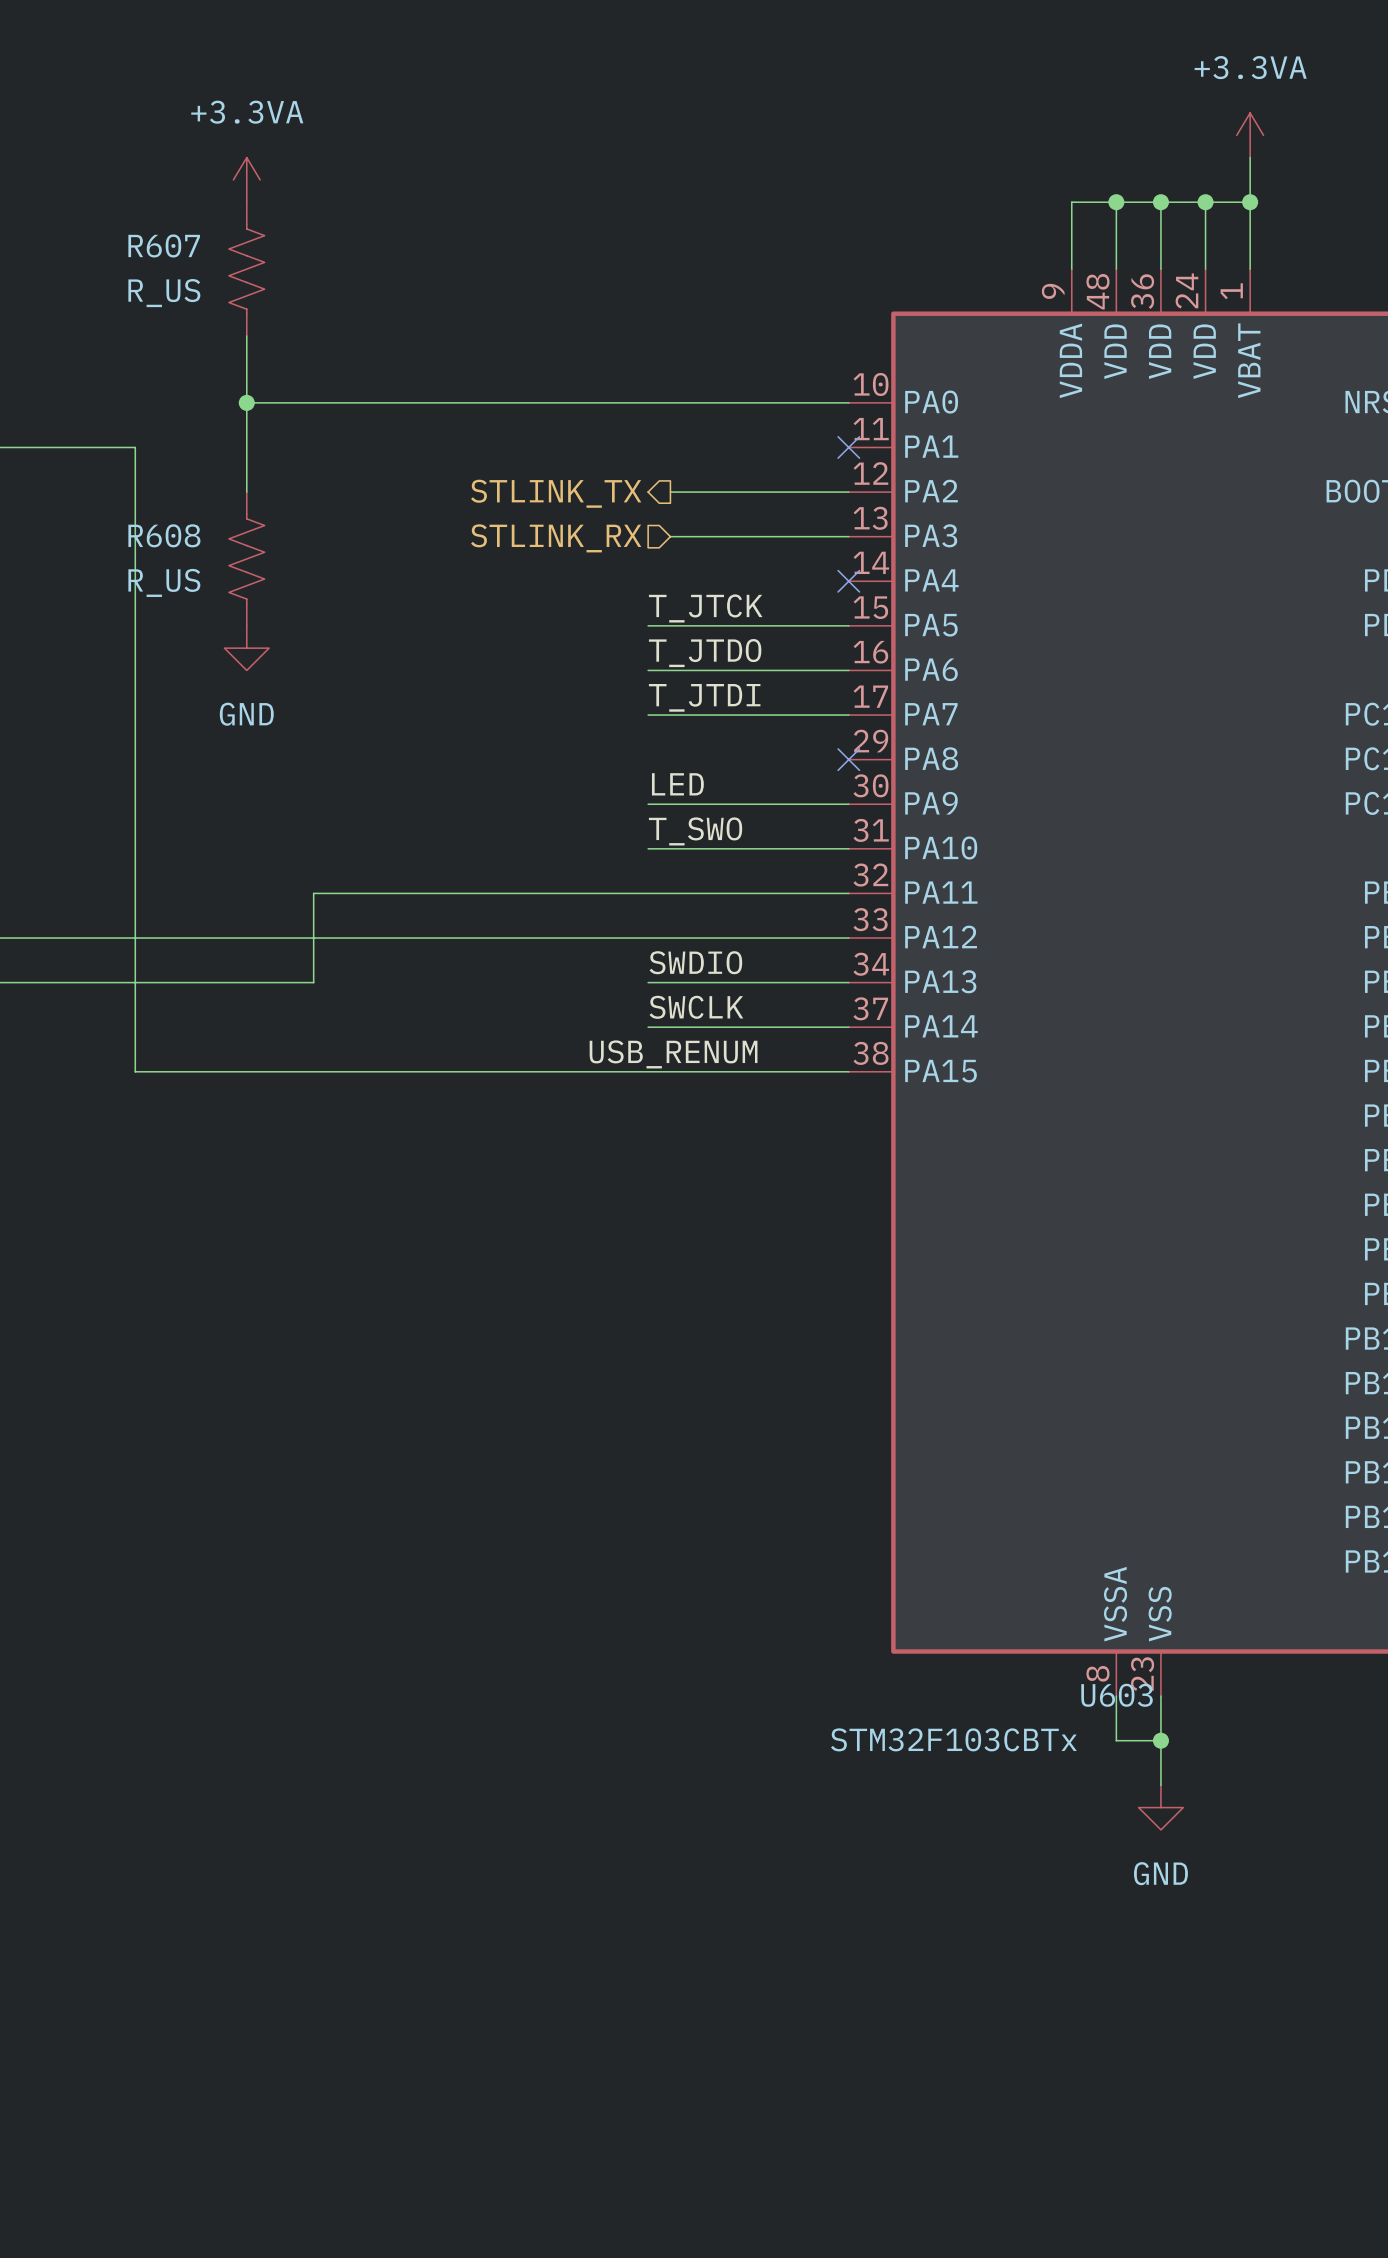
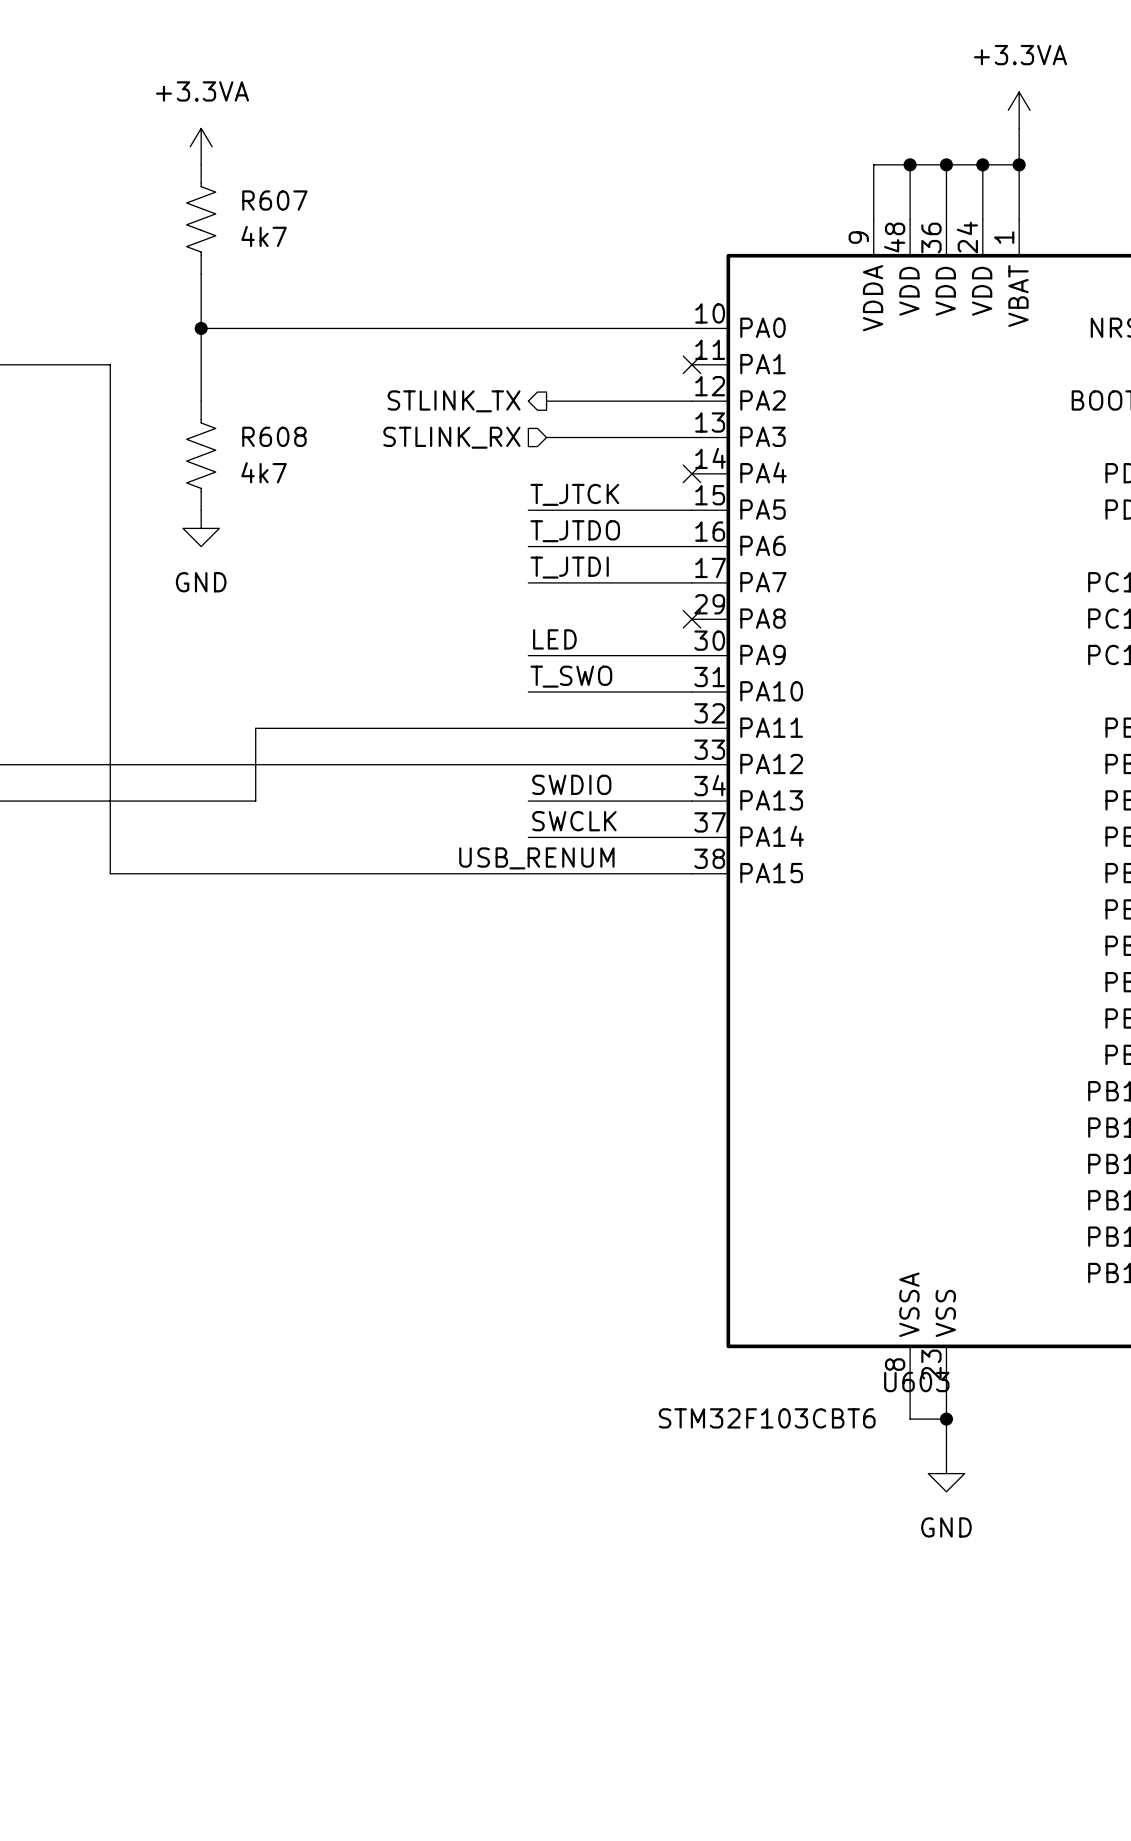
R607 name position: R607 (164, 245) -> R607 (274, 200)
R607 value: R_US (164, 293) -> 4k7 (264, 236)
R608 name position: R608 (164, 535) -> R608 (274, 436)
R608 value: R_US (164, 582) -> 4k7 (264, 472)
U603 value: STM32F103CBTx (953, 1739) -> STM32F103CBT6 (767, 1418)

